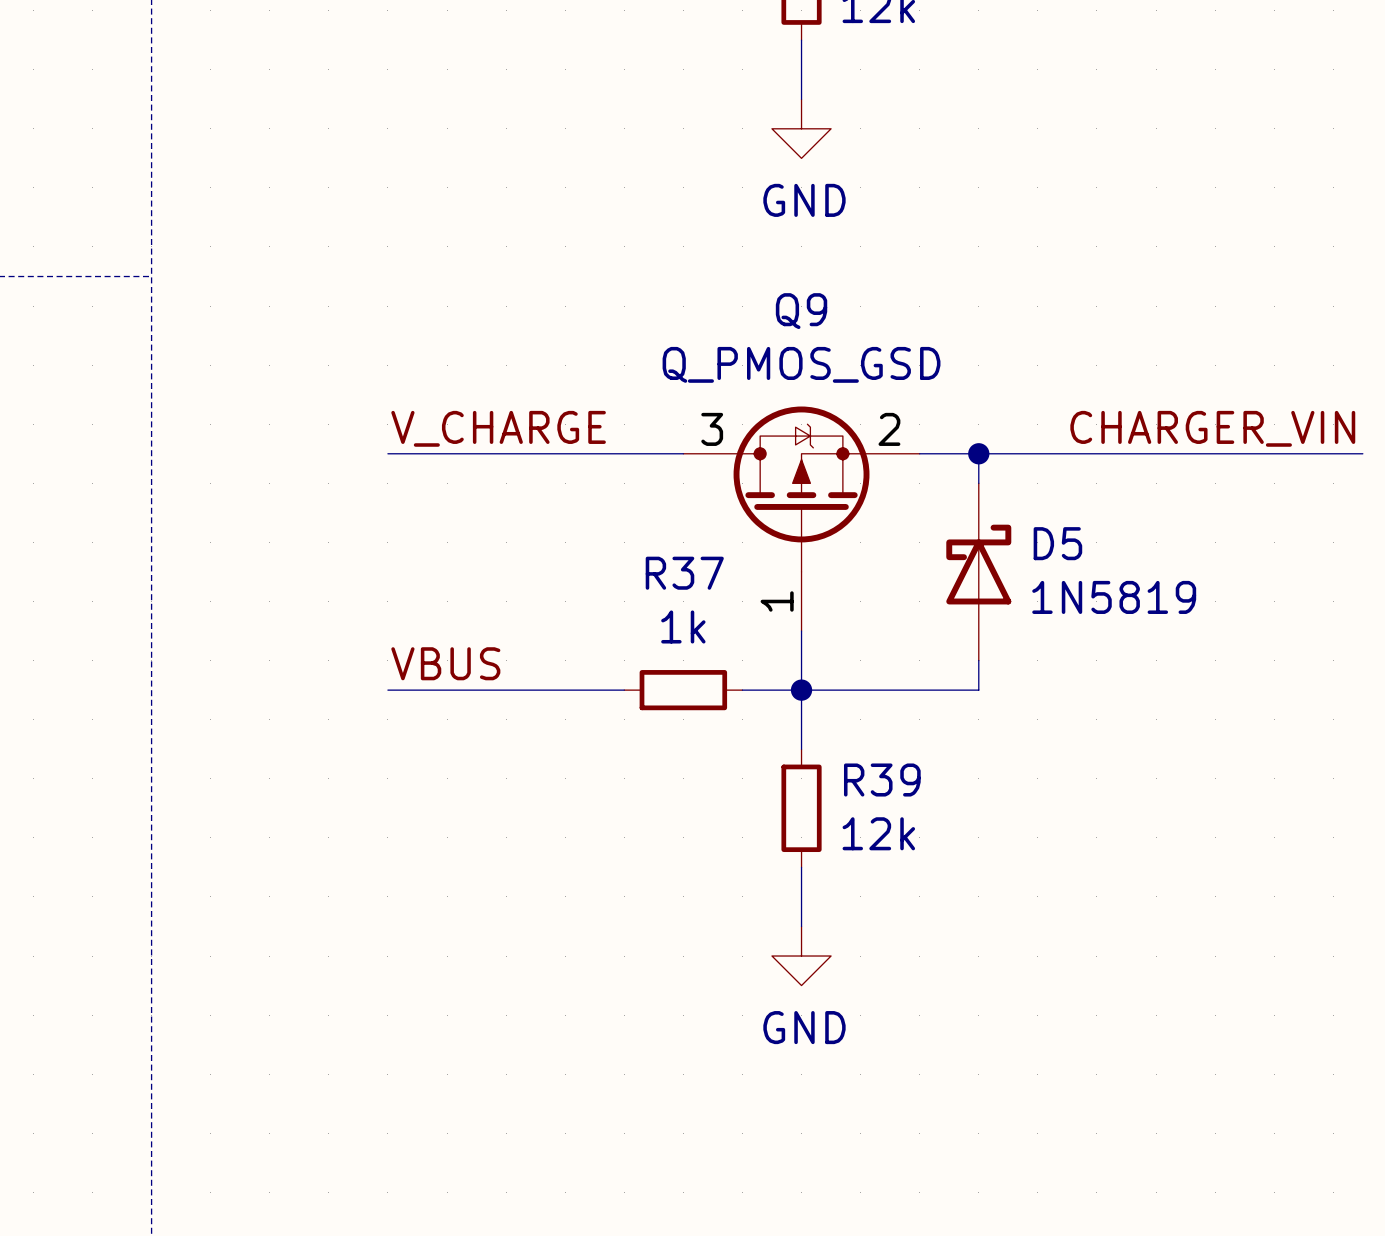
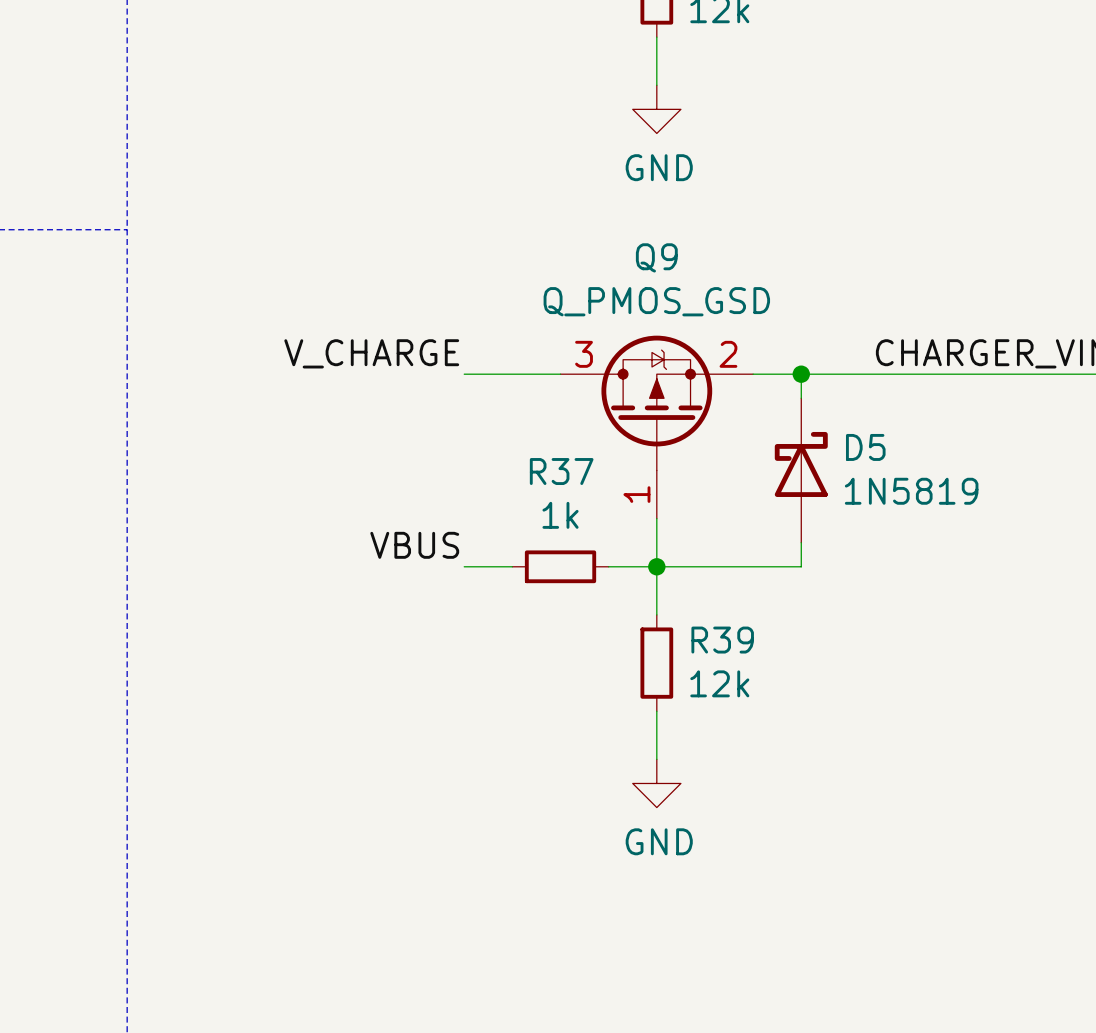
label position: V_CHARGE (498, 428) -> V_CHARGE (371, 353)
wire: (387, 453) (565, 453) -> none
label position: VBUS (445, 663) -> VBUS (414, 545)
wire: (387, 690) (565, 690) -> none

